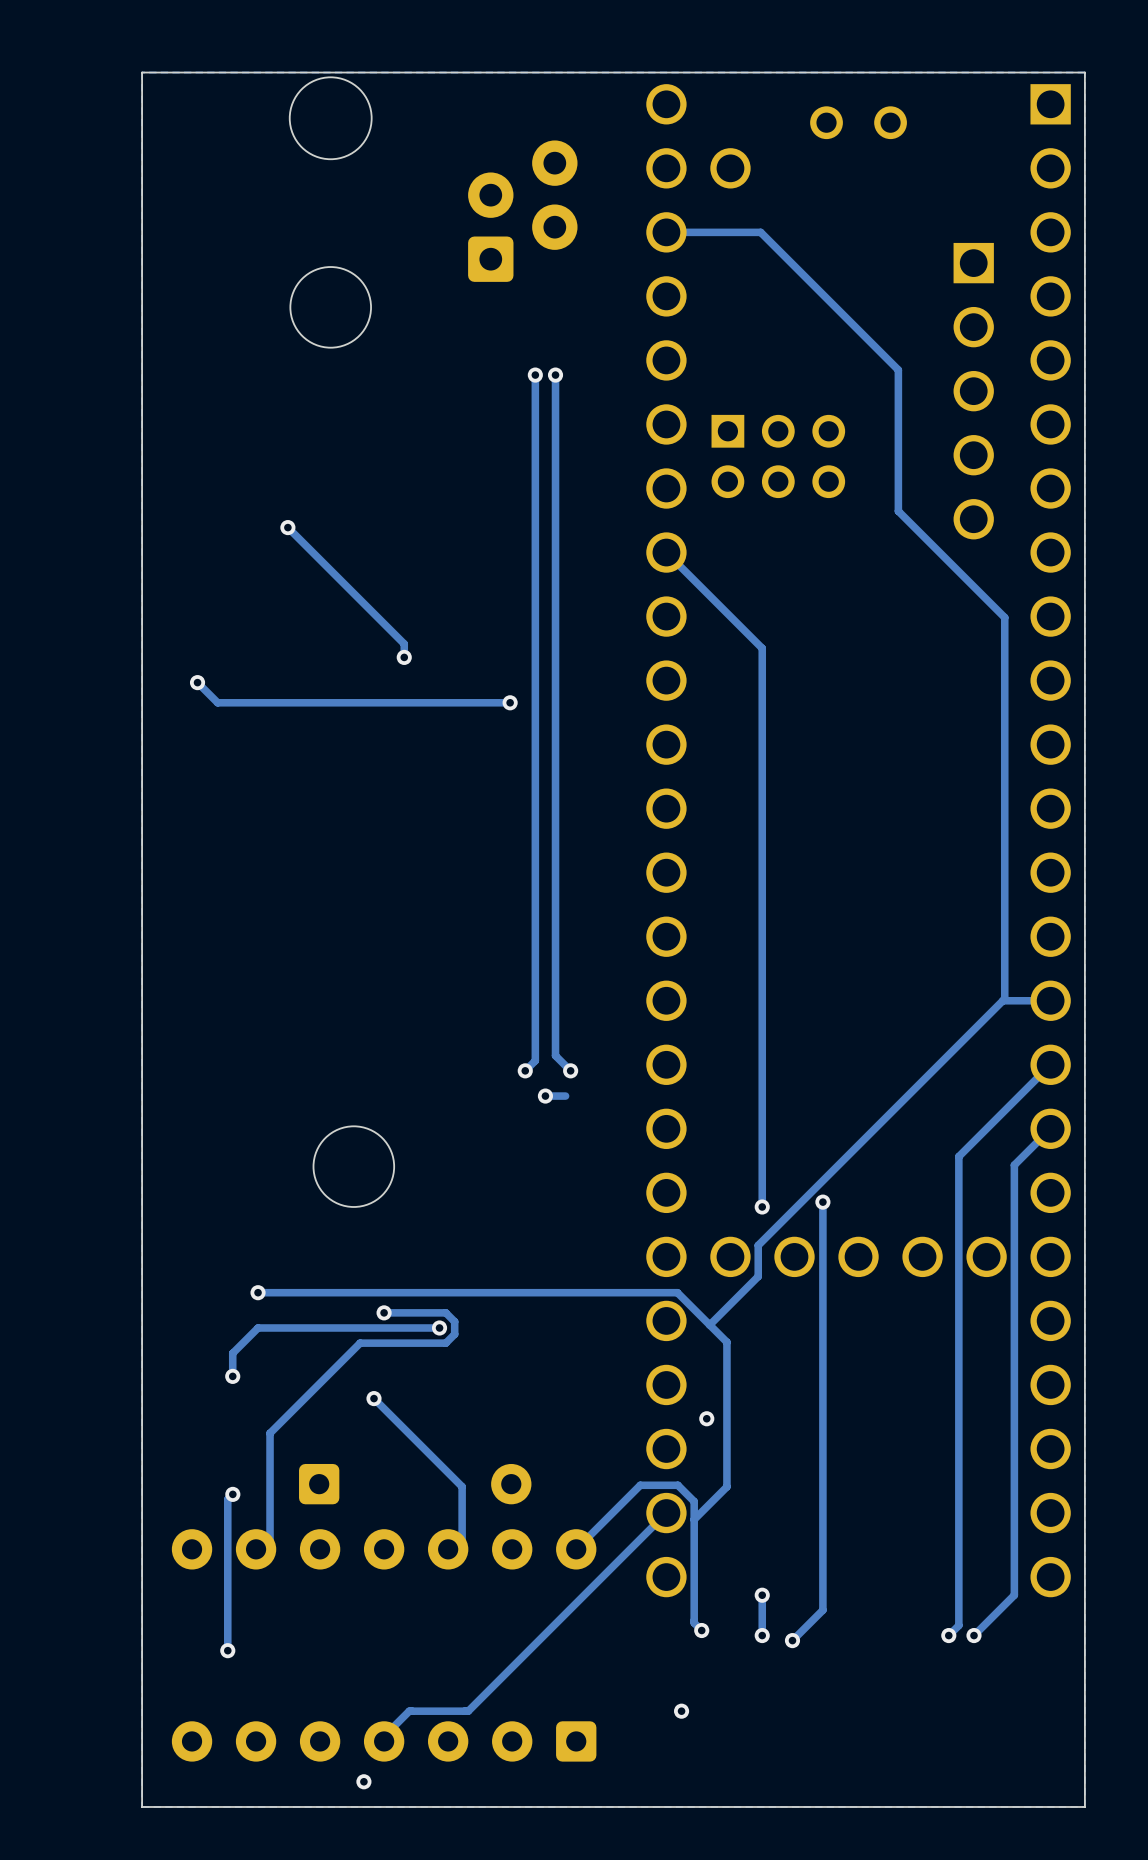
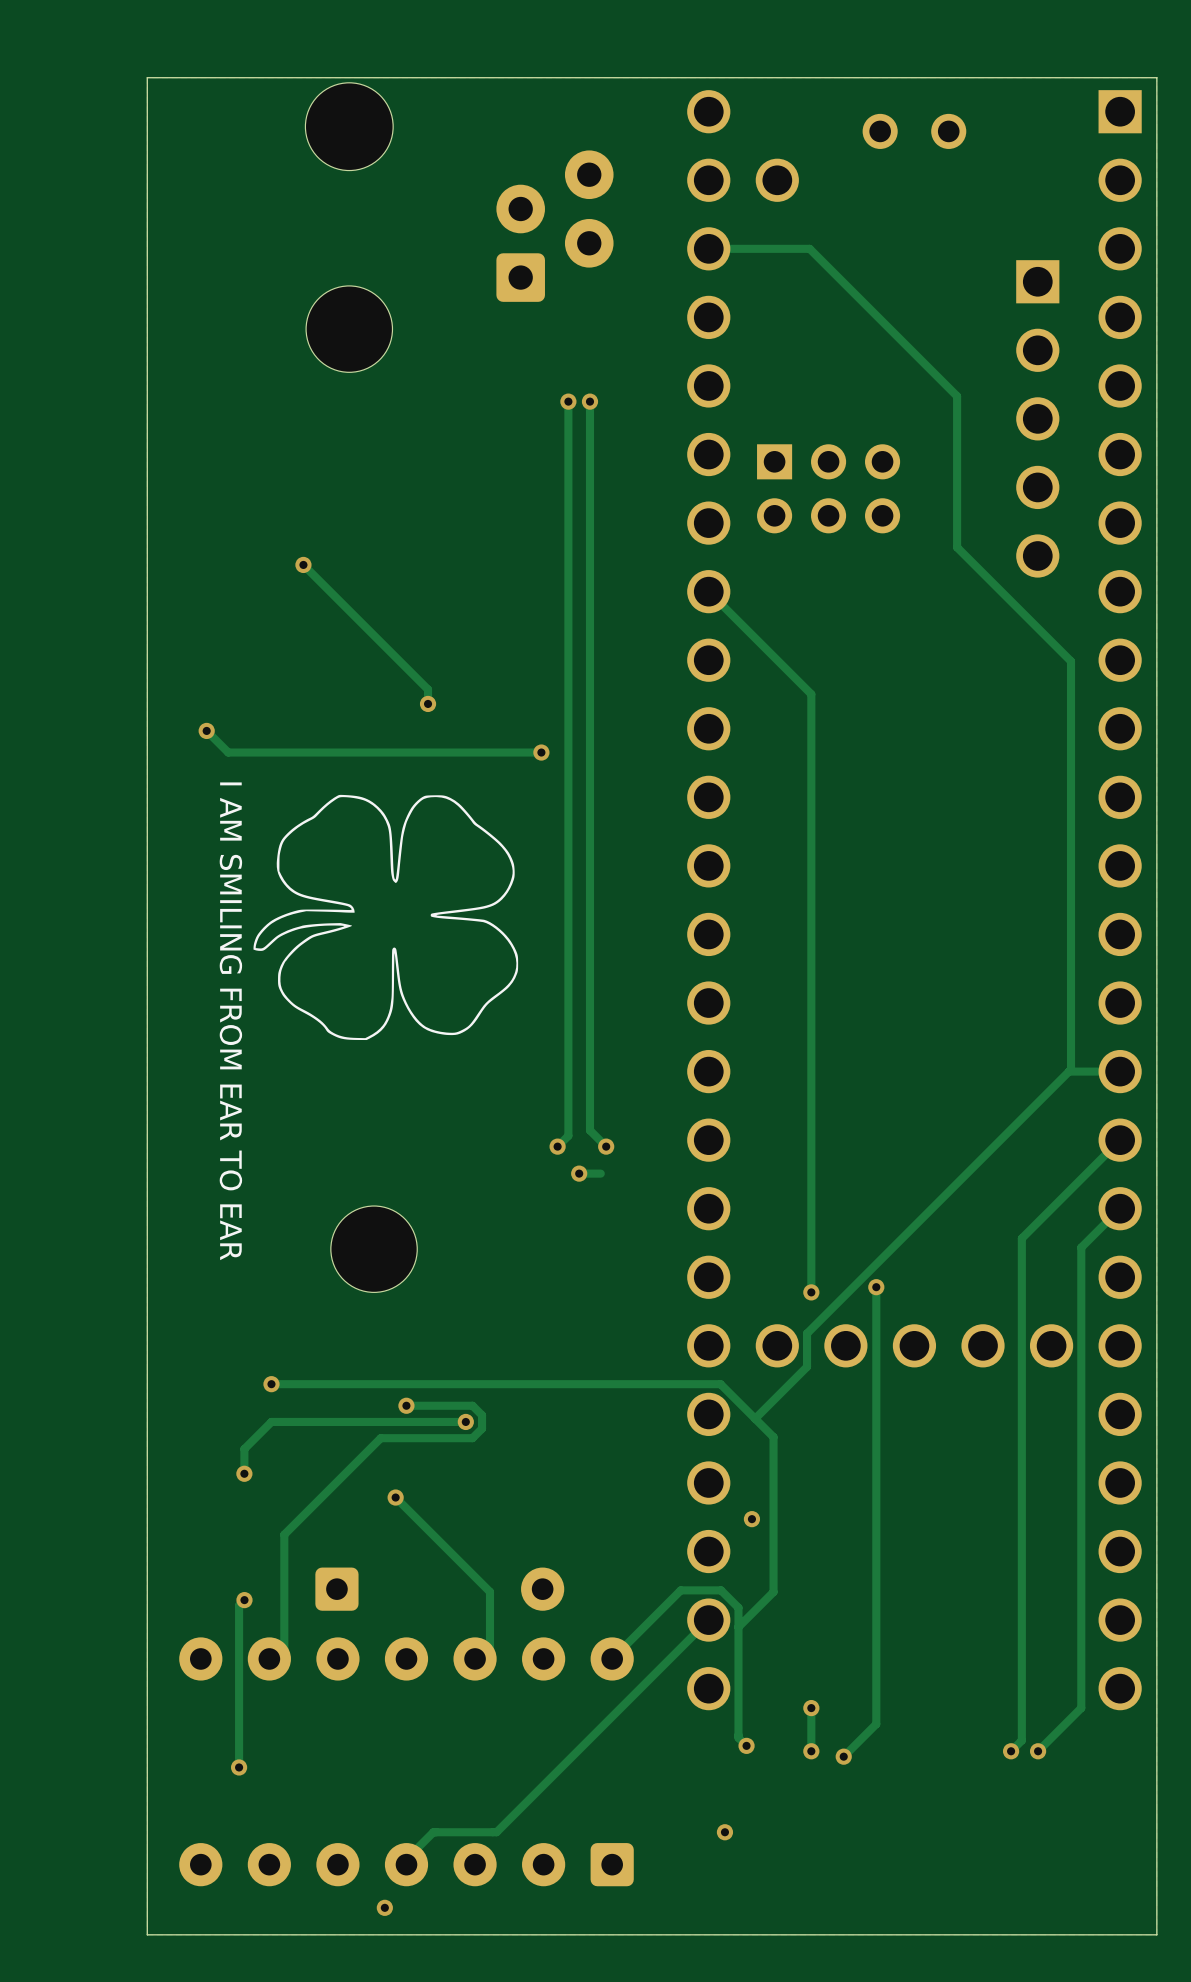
drawing: none -> [253, 794, 519, 1041]
text: none -> I AM SMILING FROM EAR TO EAR (230, 1021)

